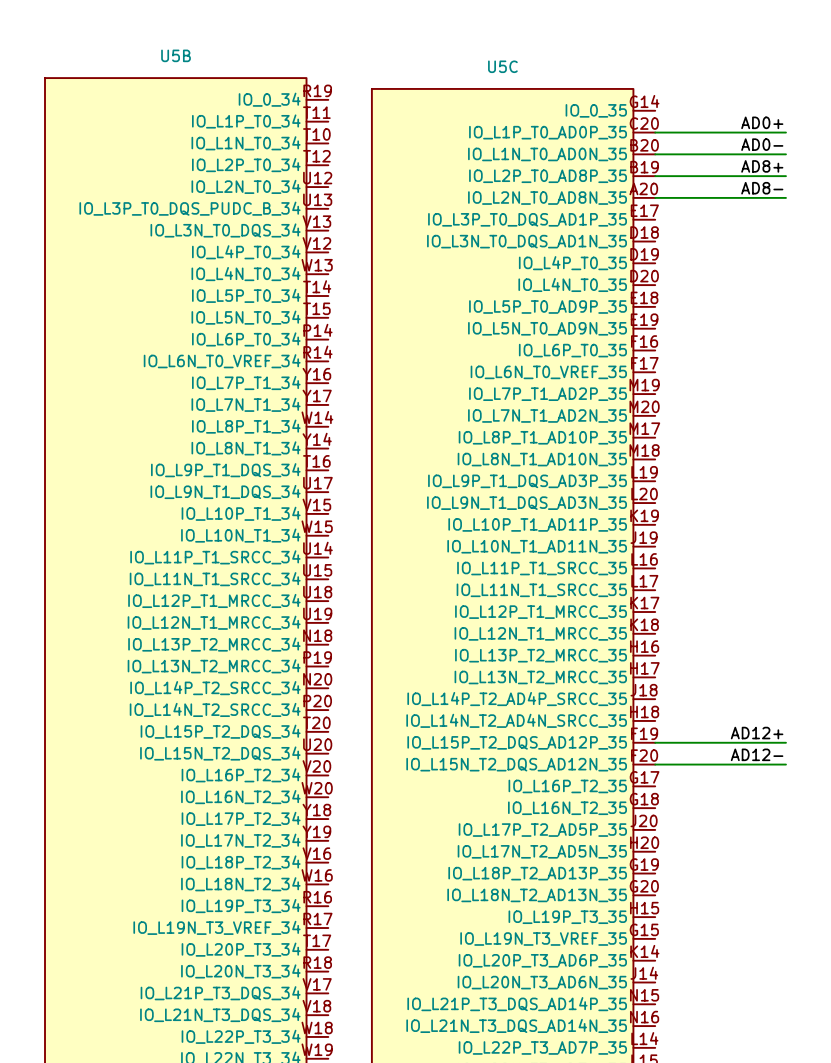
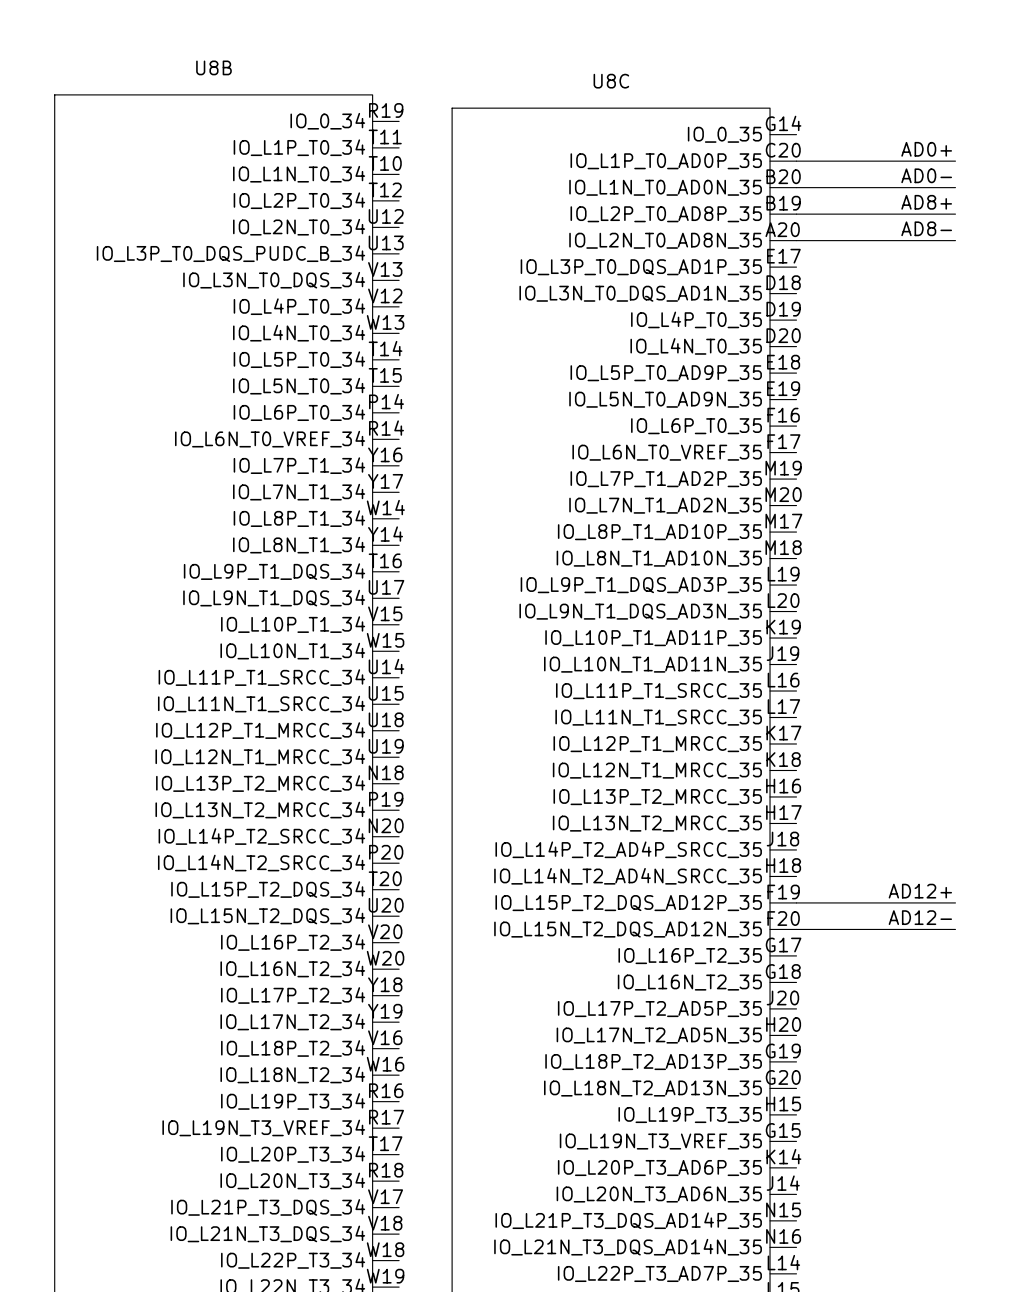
U5B name: U5B (176, 55) -> U8B (213, 67)
U5C name: U5C (502, 66) -> U8C (611, 81)

